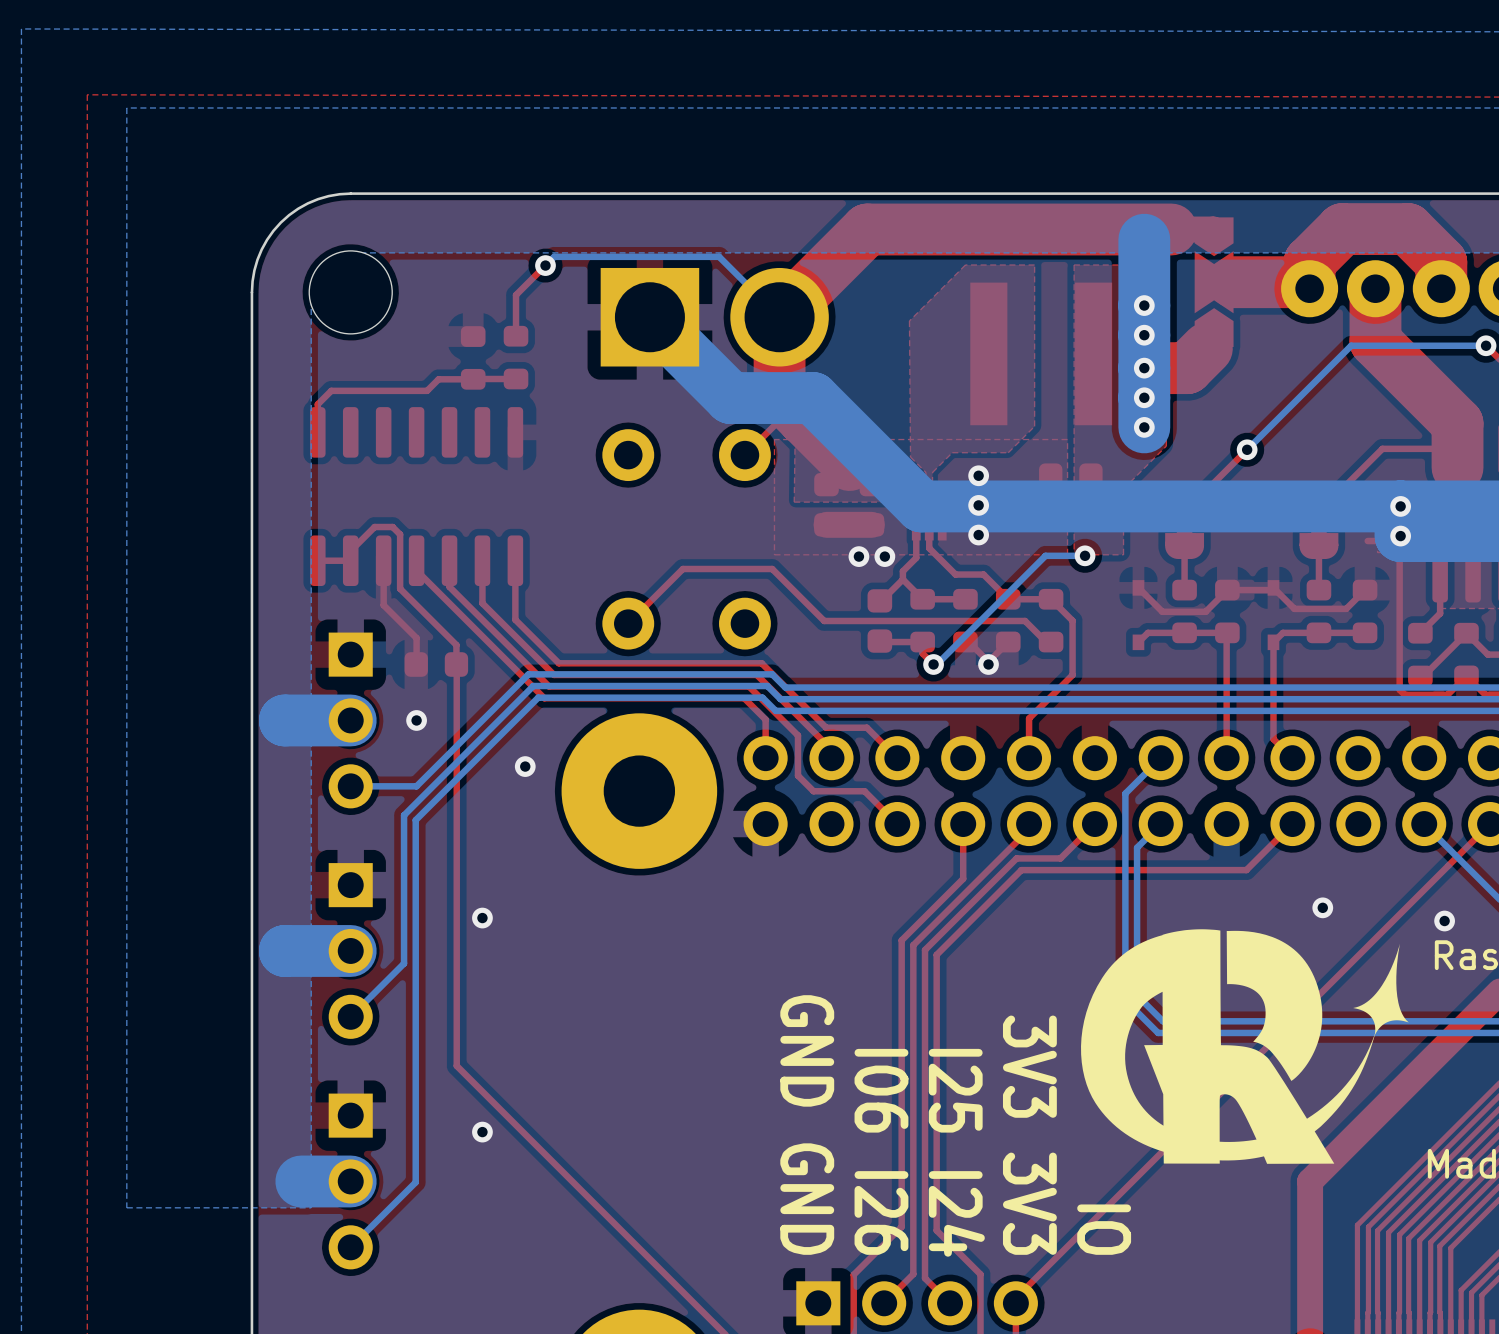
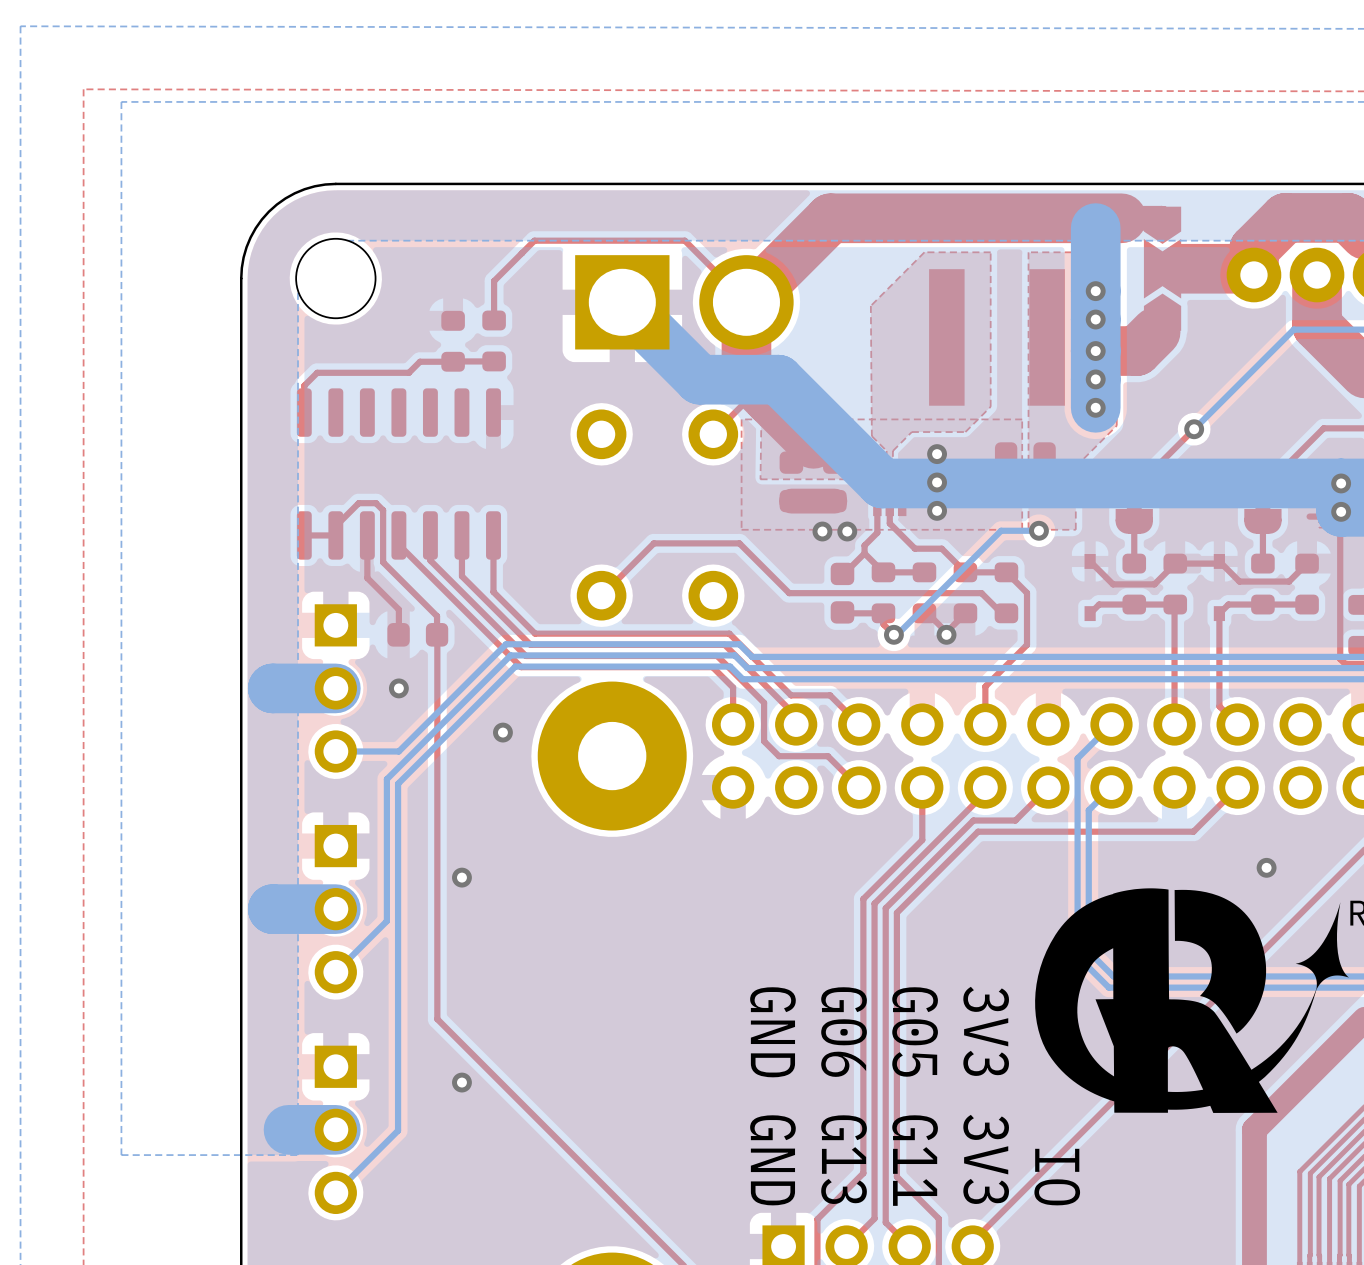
bottom track: (545, 265) (554, 256) (719, 256) (779, 317) -> none
via: (545, 265) -> none
top track: none -> (521, 253) (534, 240) (684, 240) (746, 302)
text: I06 I26 (881, 1151) -> G06 G13 (844, 1095)
text: I25 I24 (956, 1152) -> G05 G11 (915, 1096)

